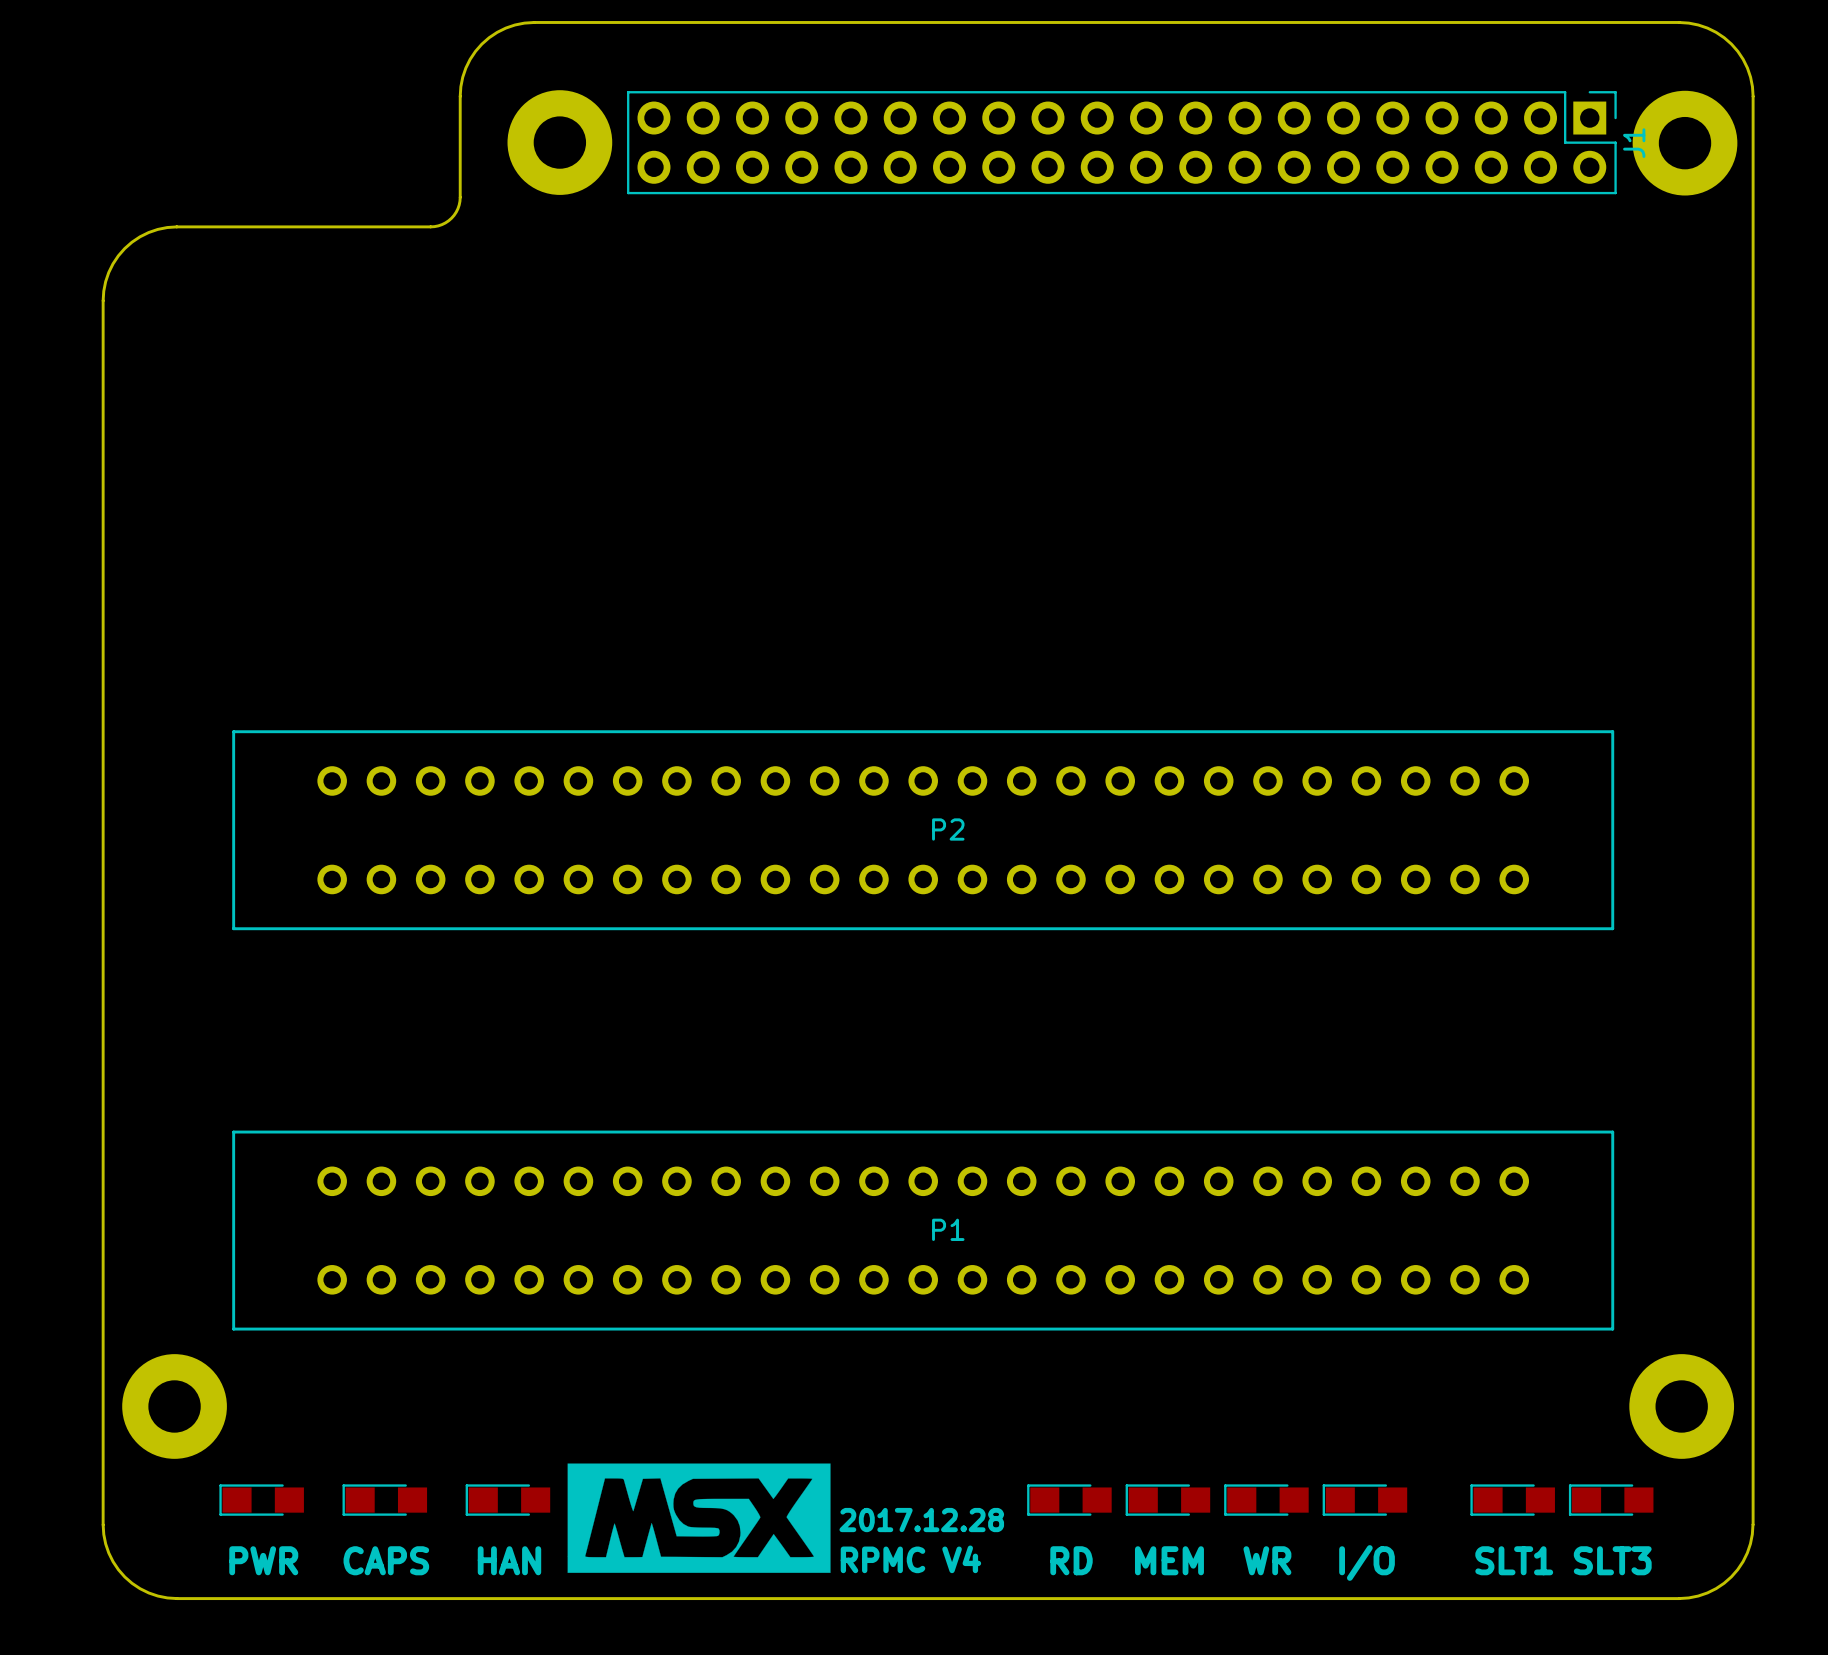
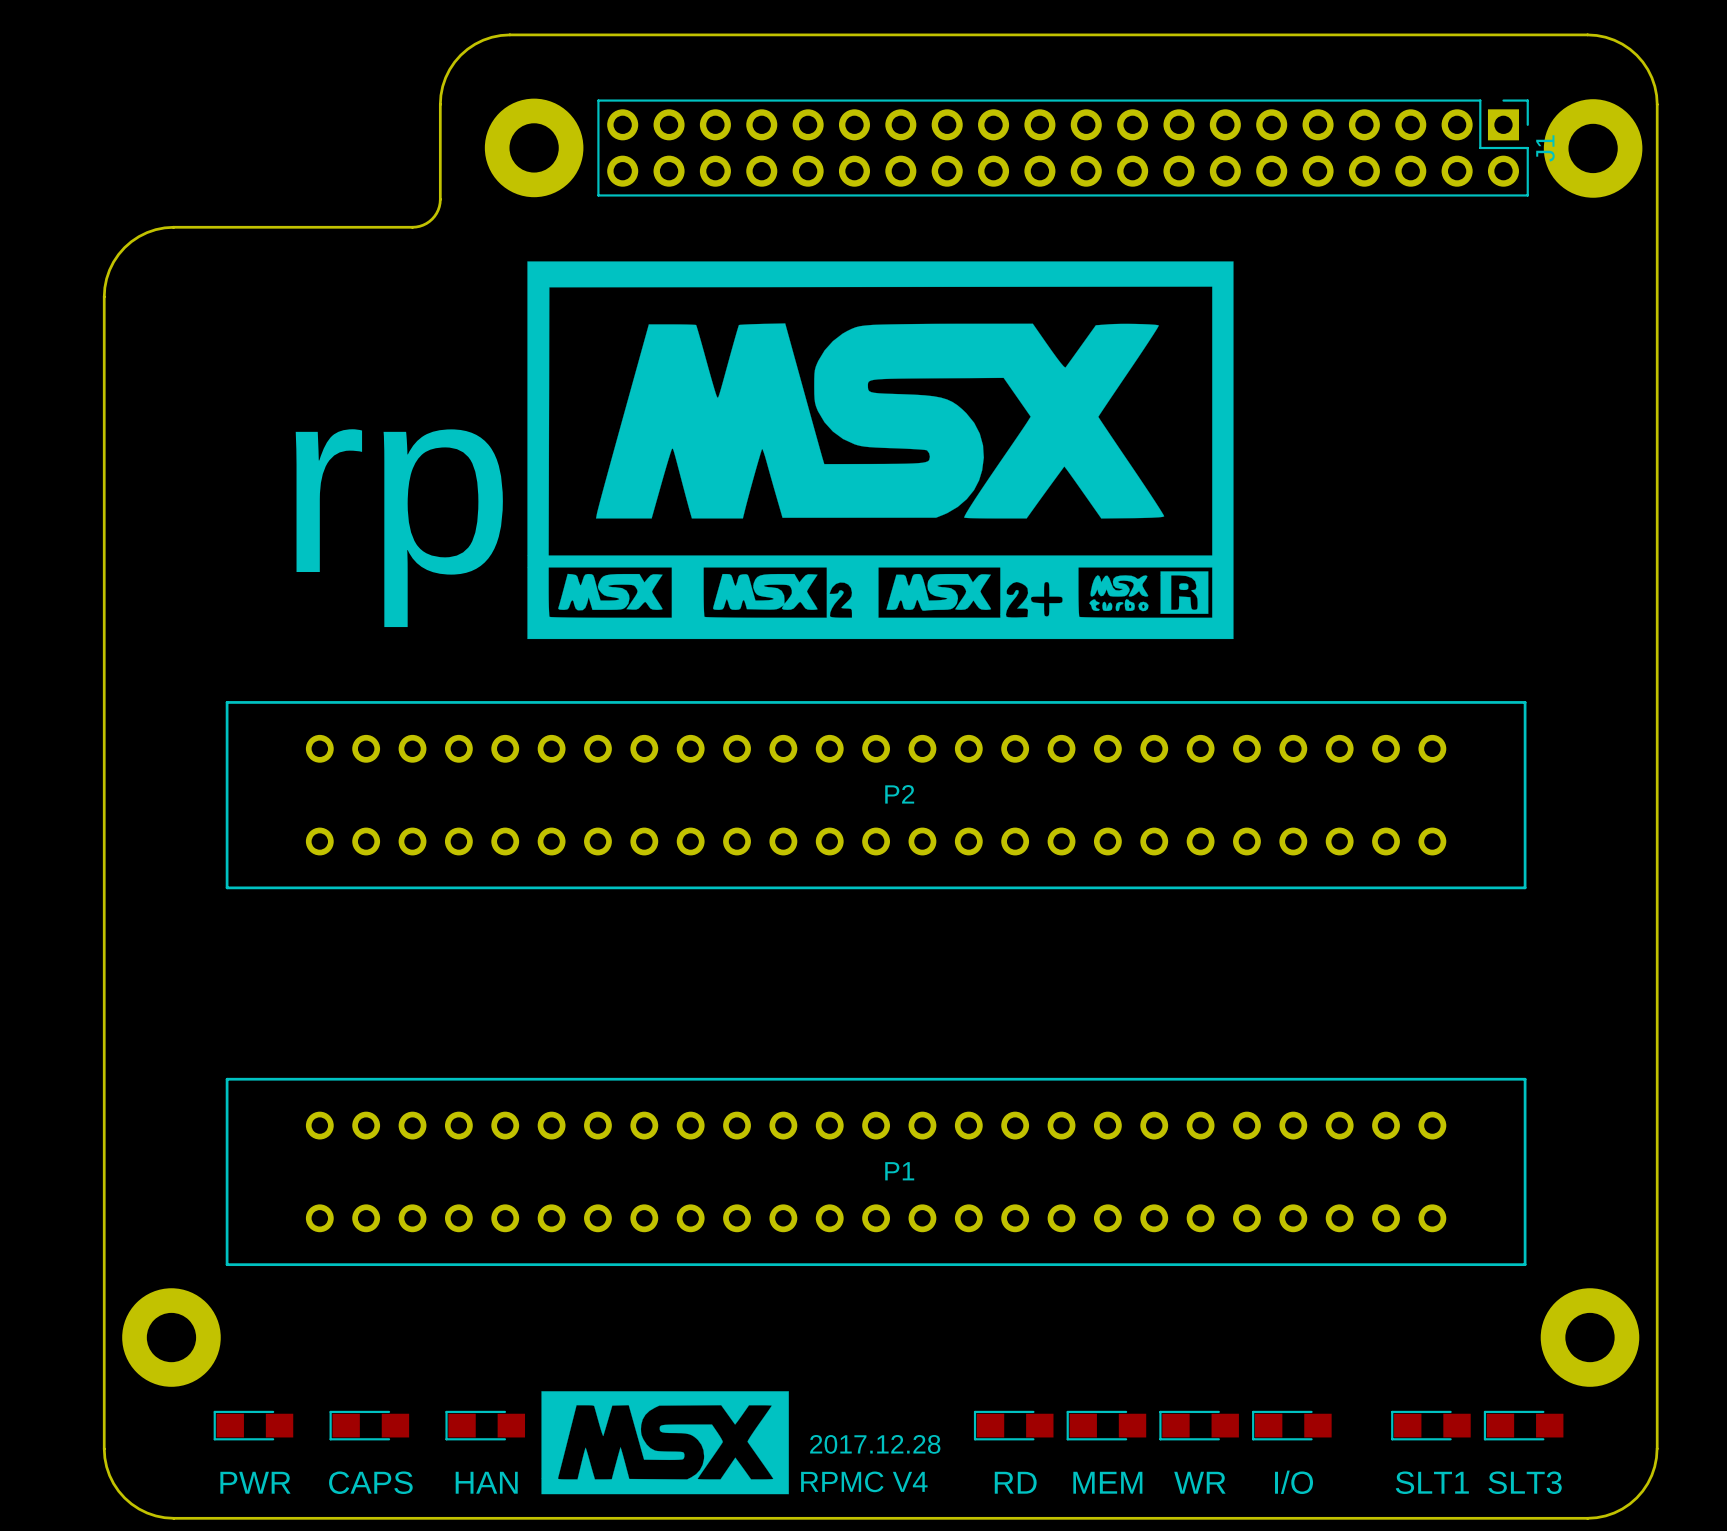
drawing: none -> [527, 261, 1234, 640]
text: none -> rp (399, 528)

